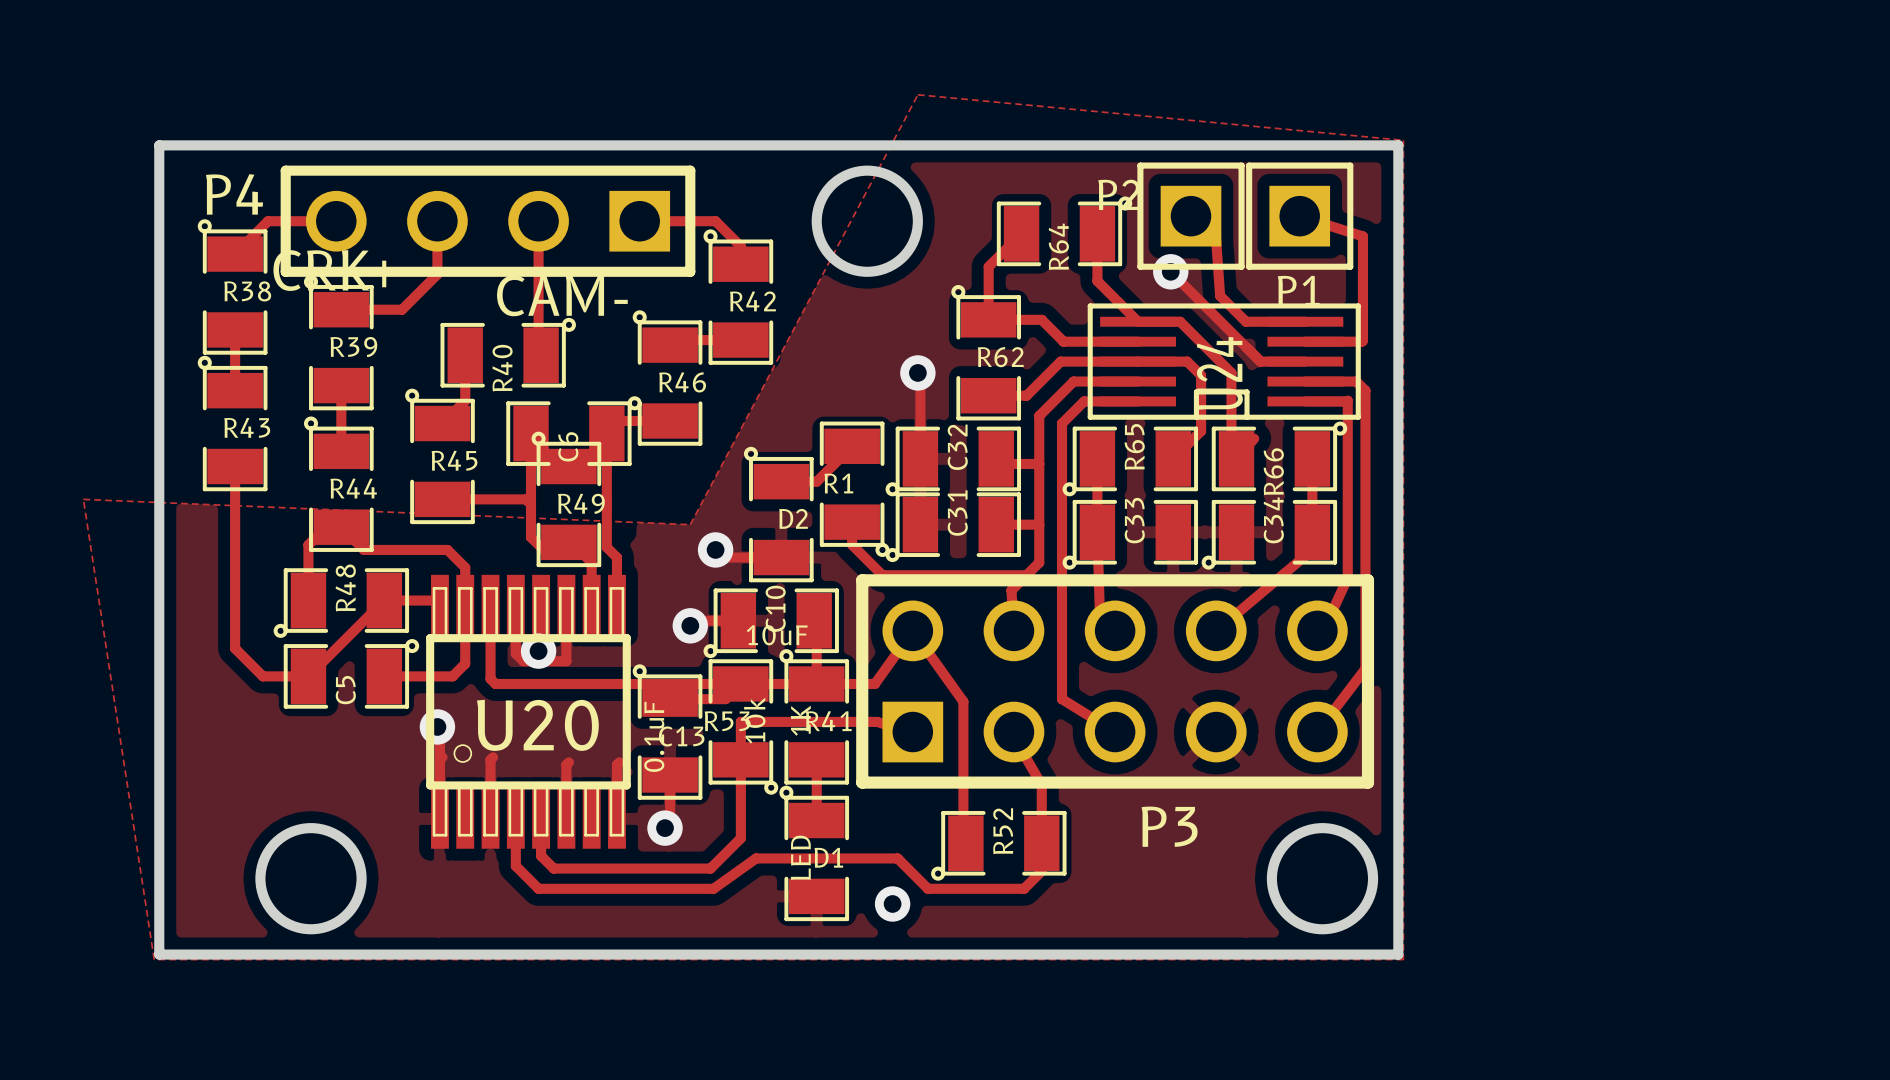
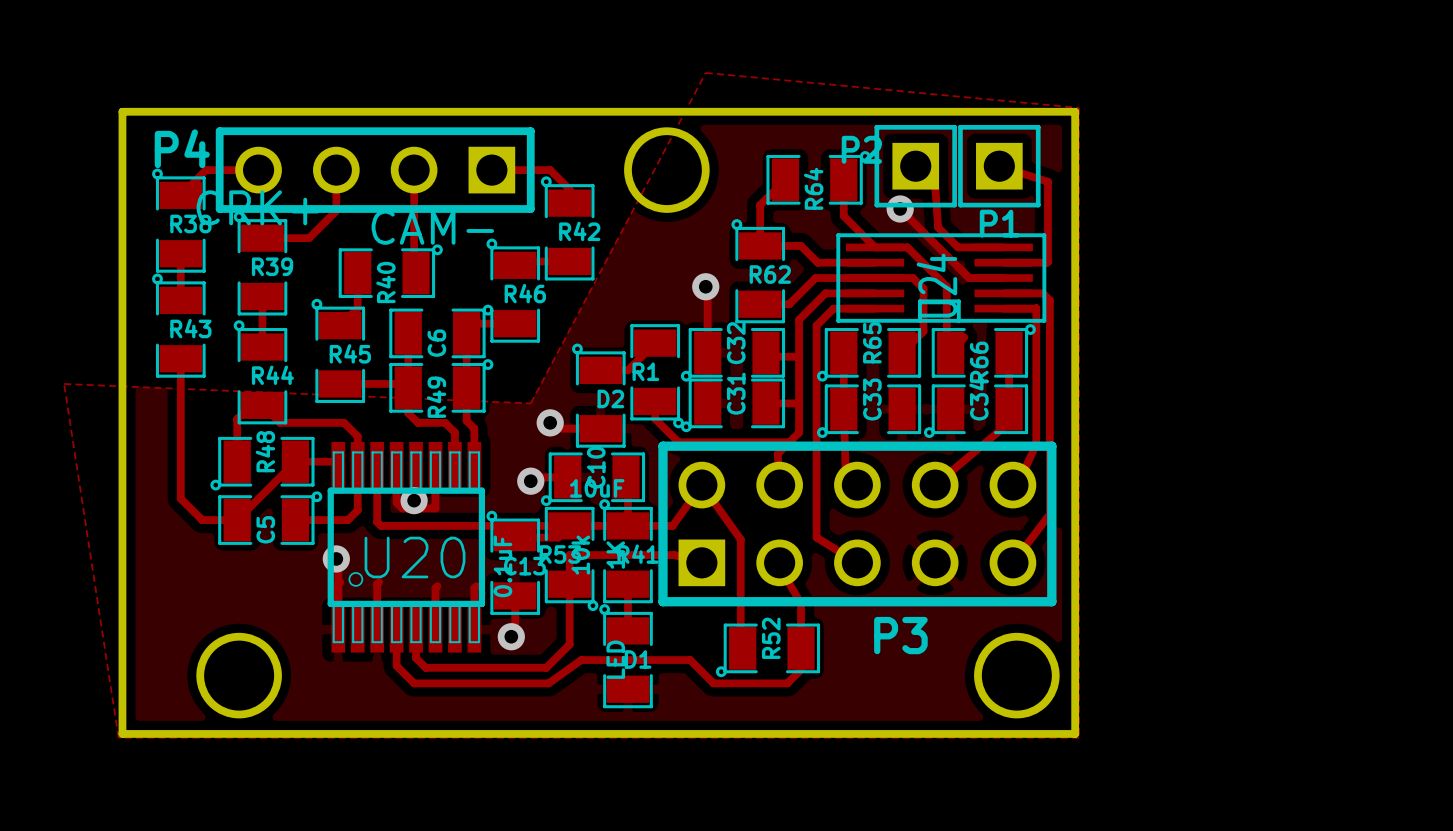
R49 rotation: 0° (566, 499) -> 90° clockwise (441, 385)
via: (892, 903) -> none

